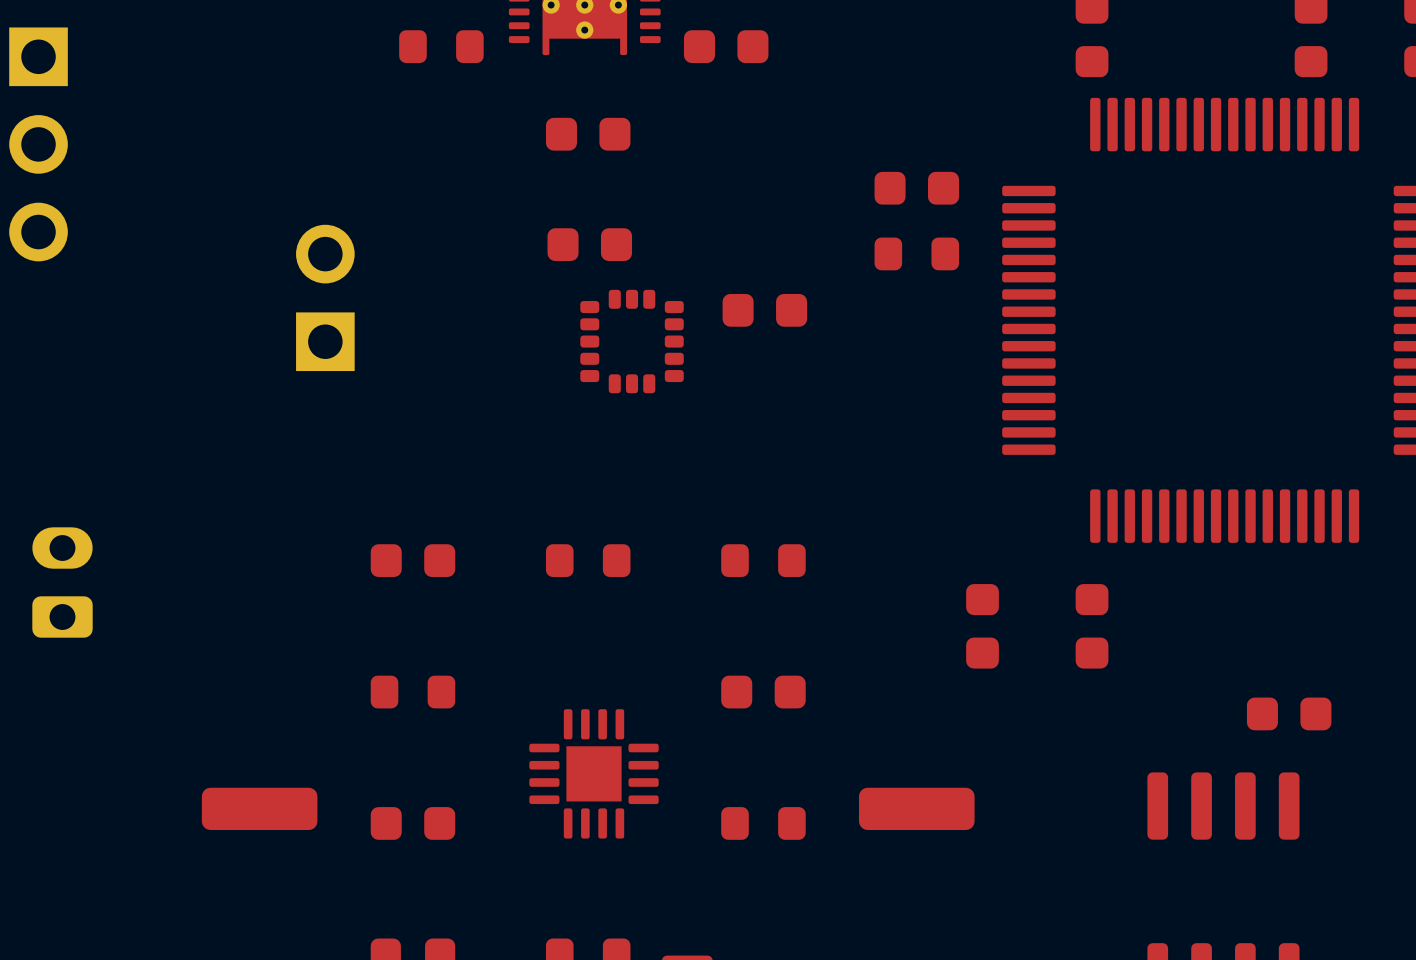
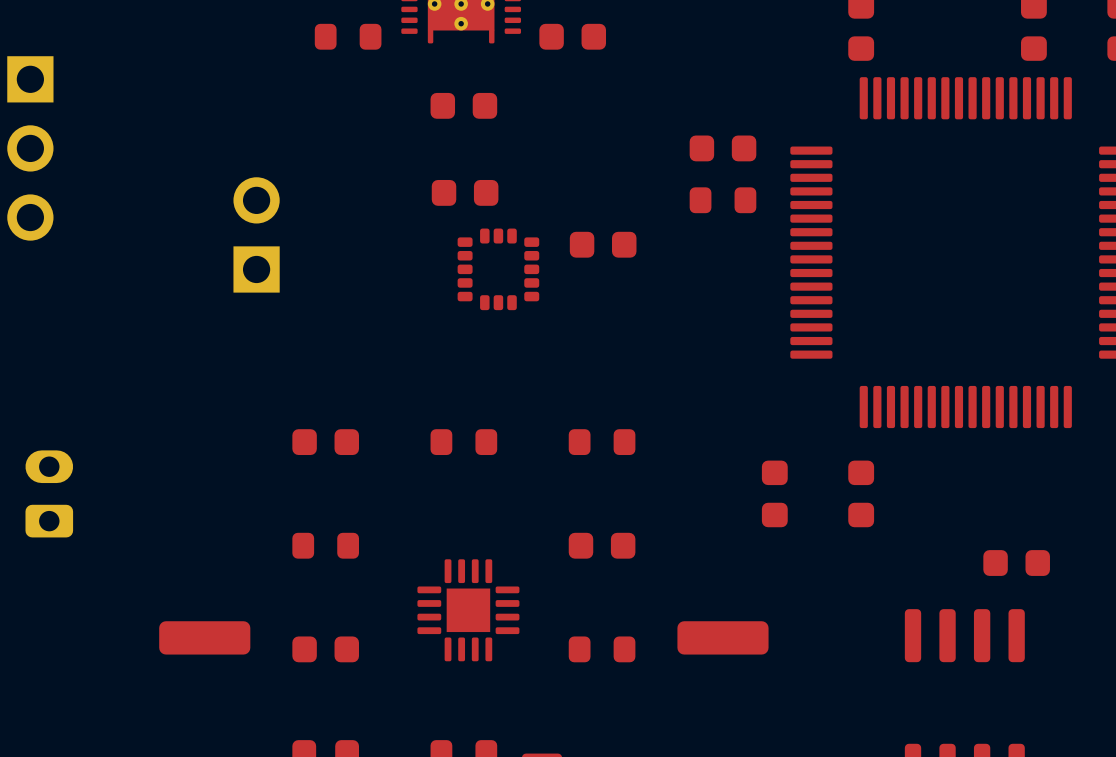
part position: (38, 144) -> (30, 148)
part position: (62, 582) -> (49, 493)

